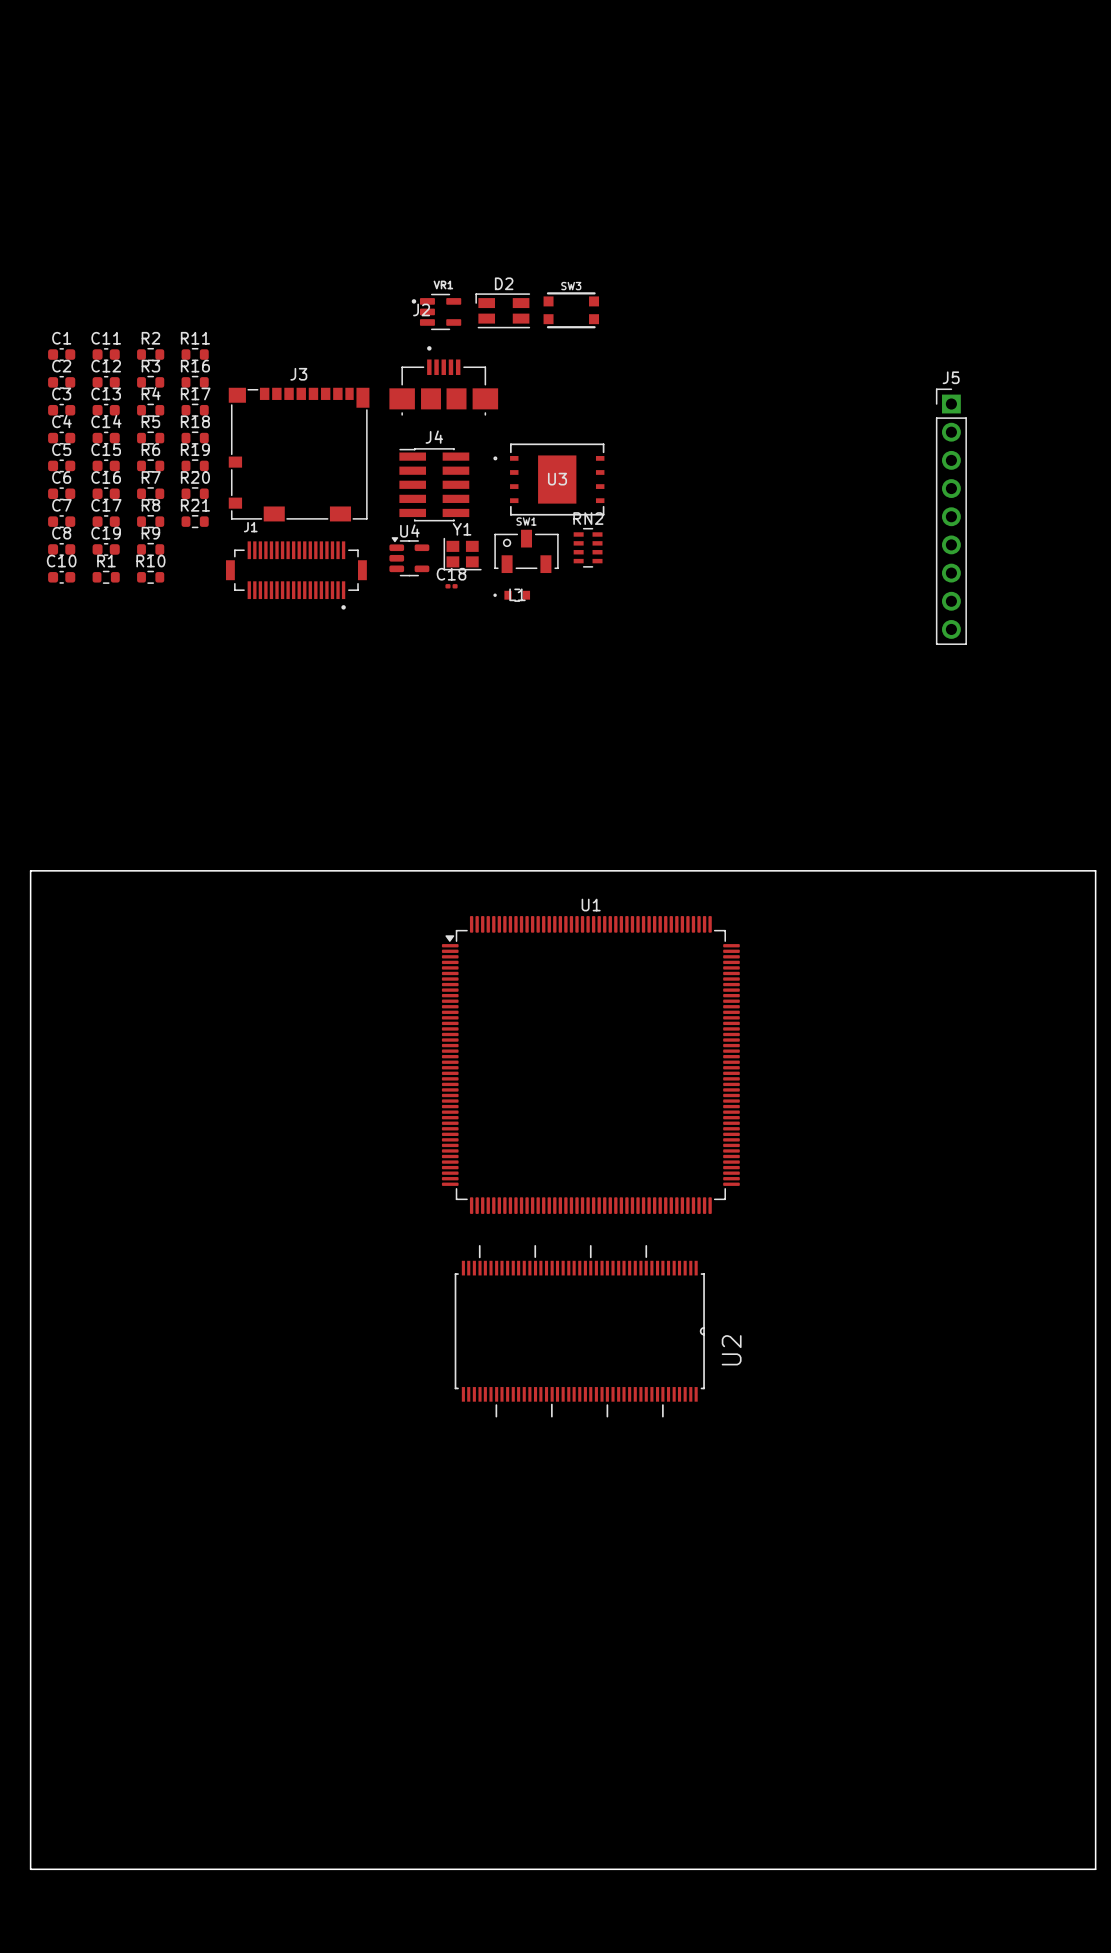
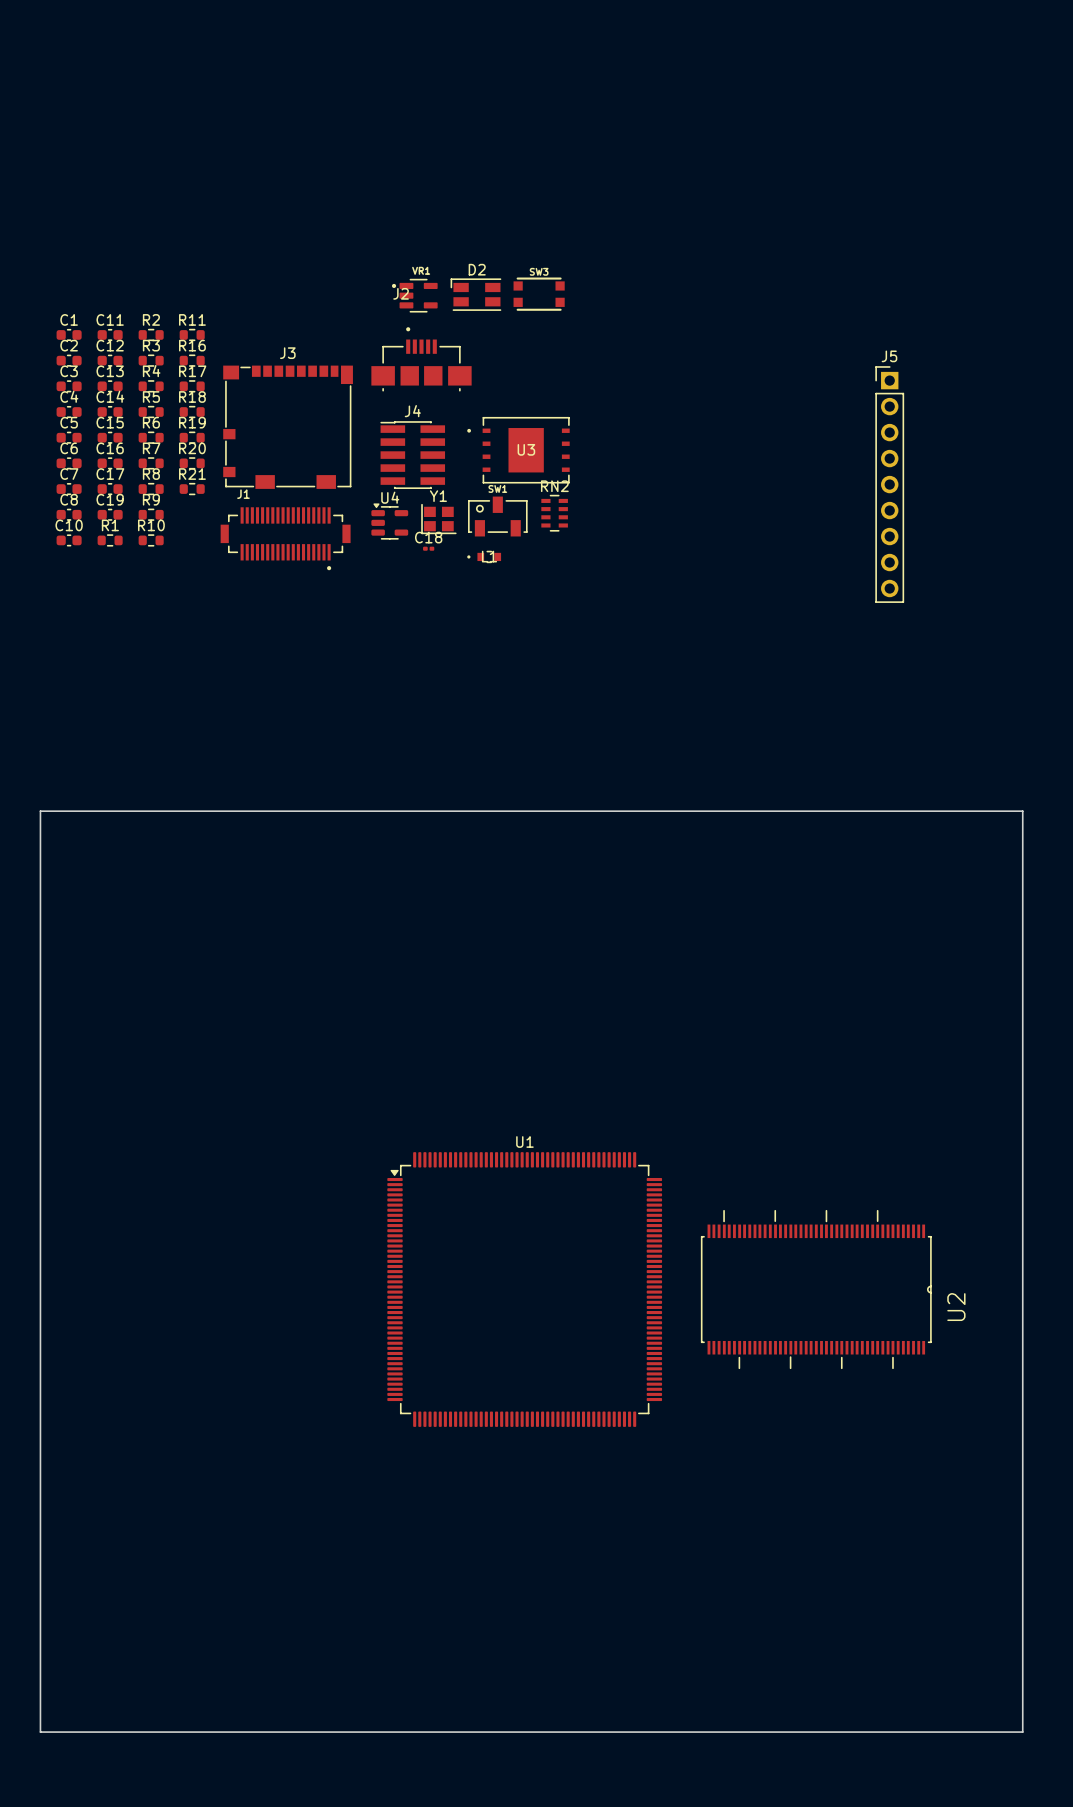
U1 position: (590, 1064) -> (524, 1289)
U2 position: (579, 1331) -> (816, 1289)

